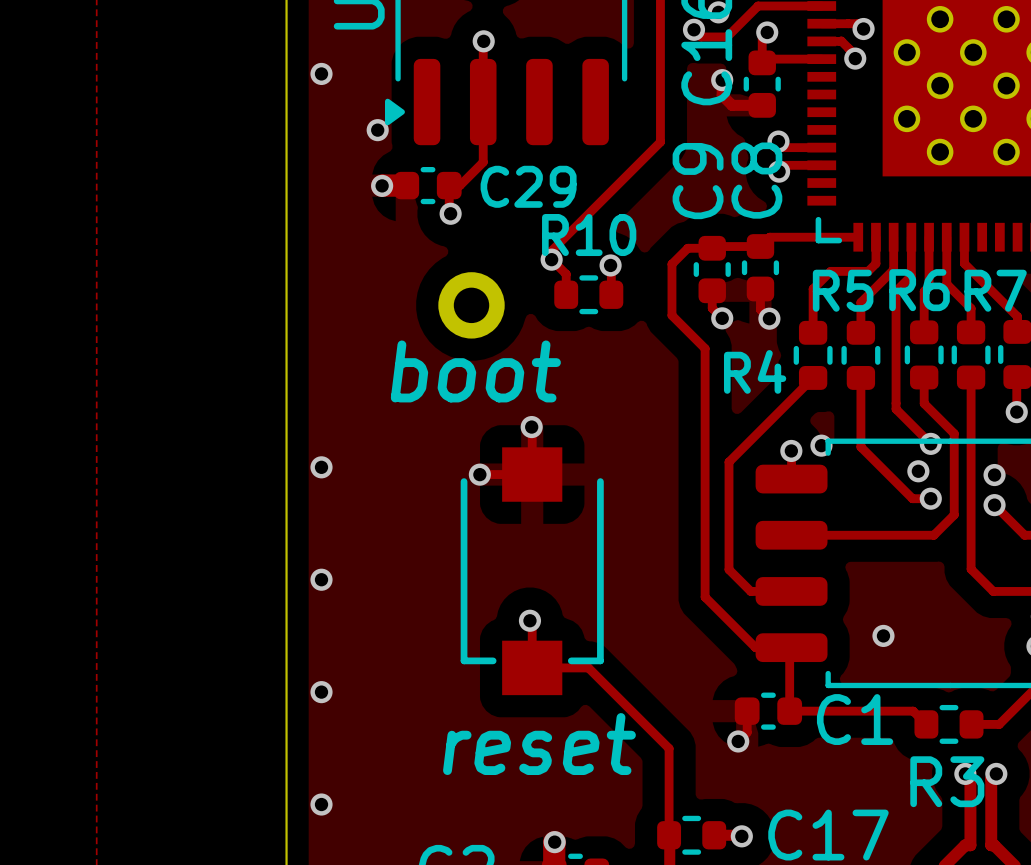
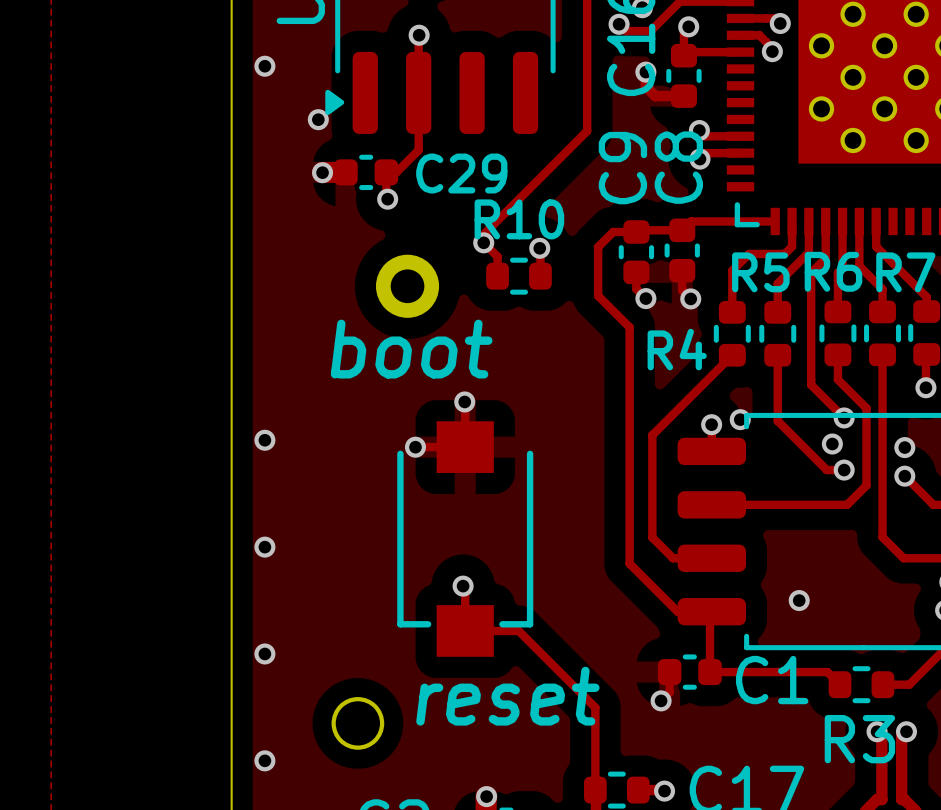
drawing: none -> [331, 697, 385, 750]
text position: reset (539, 744) -> reset (507, 696)

